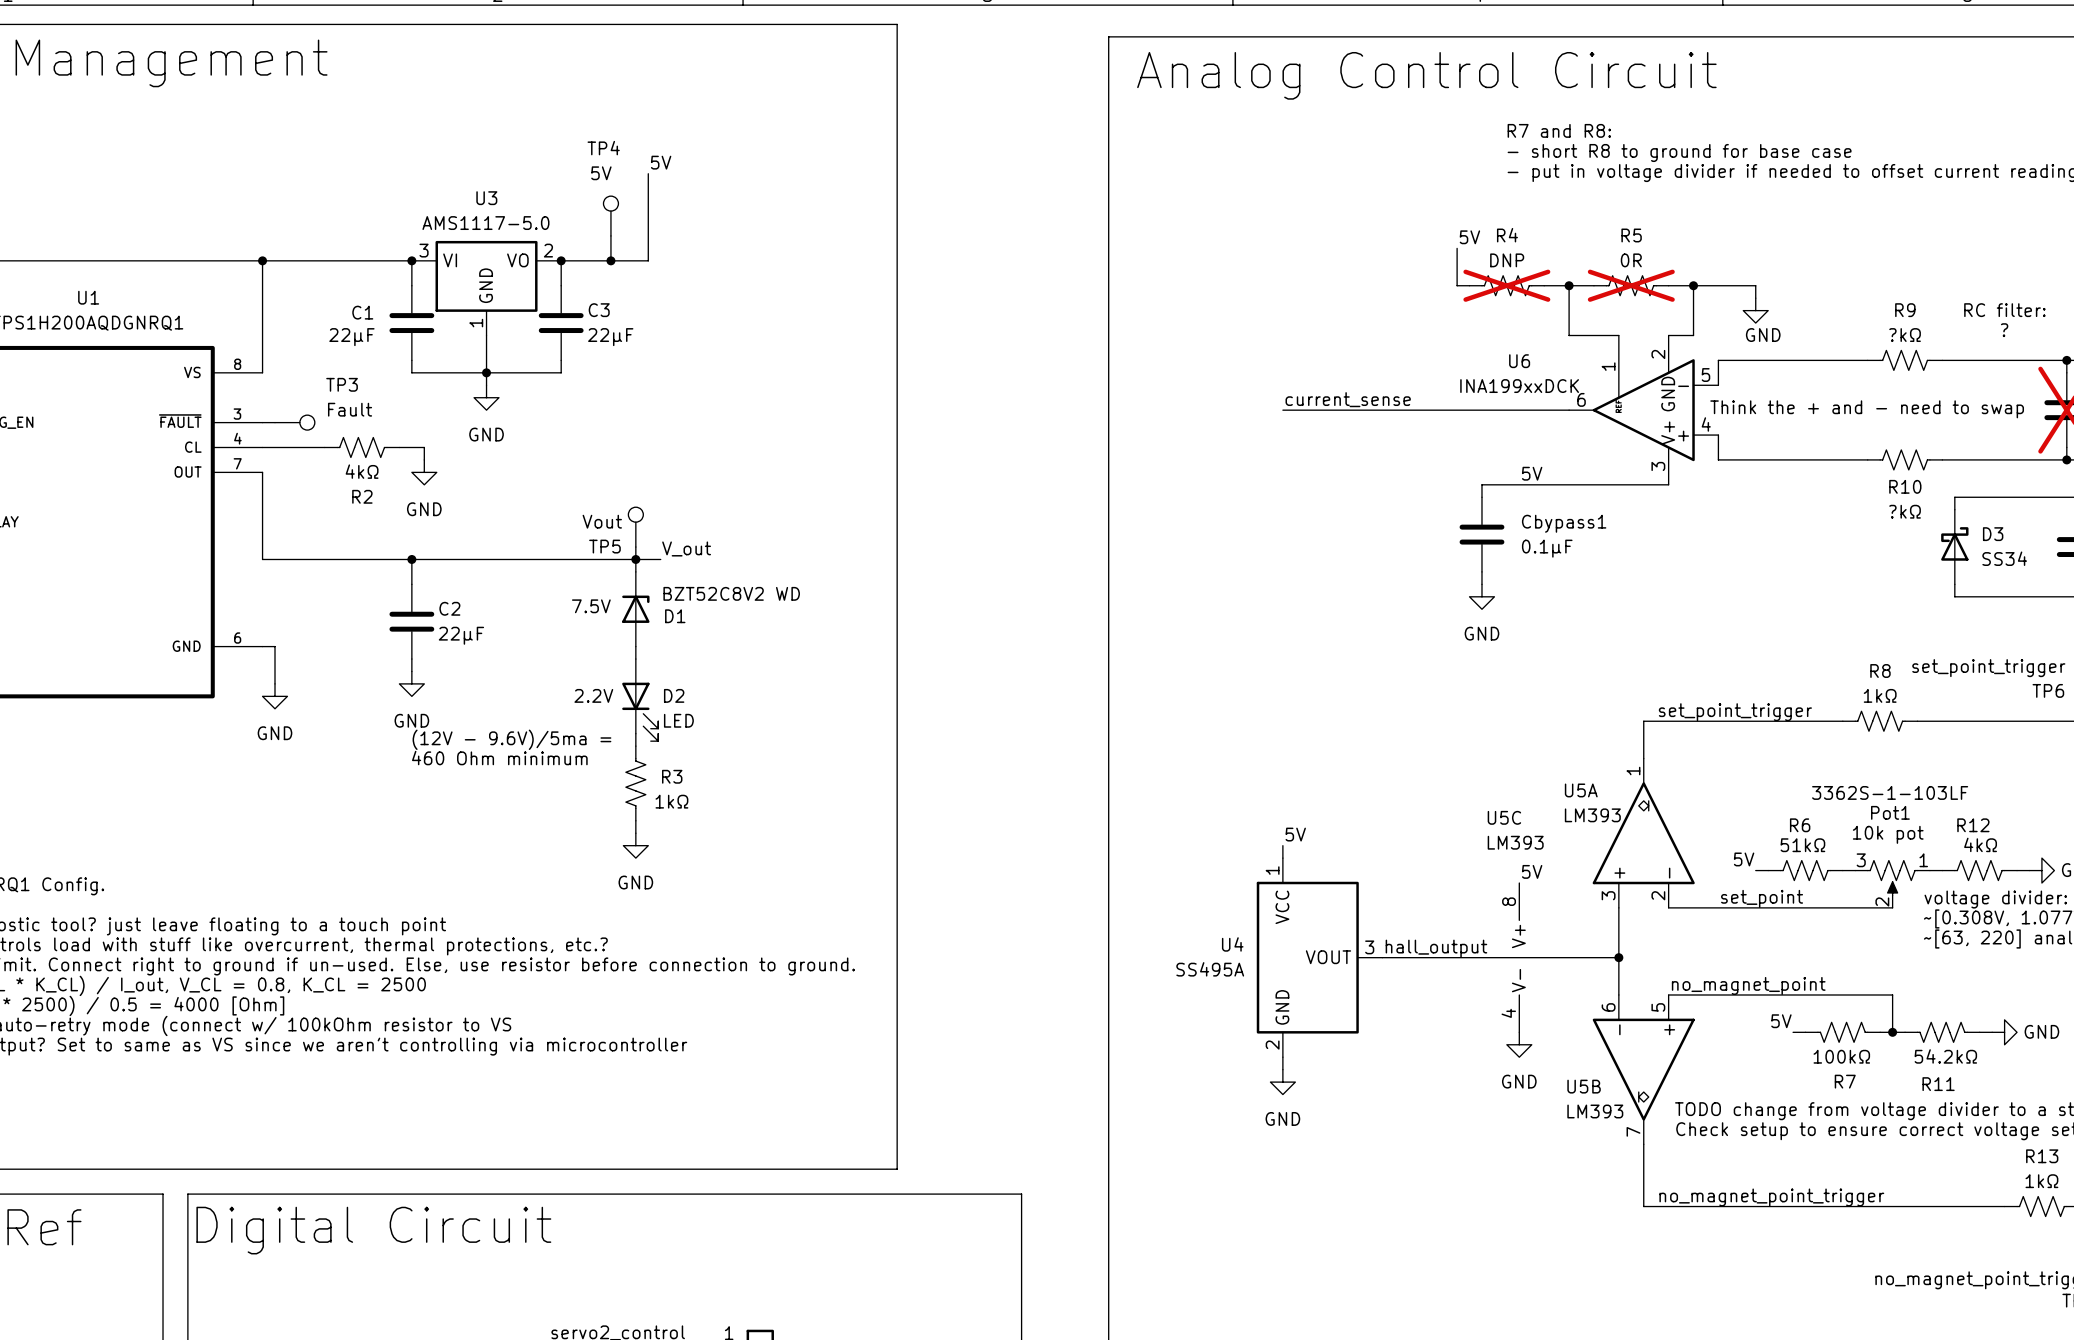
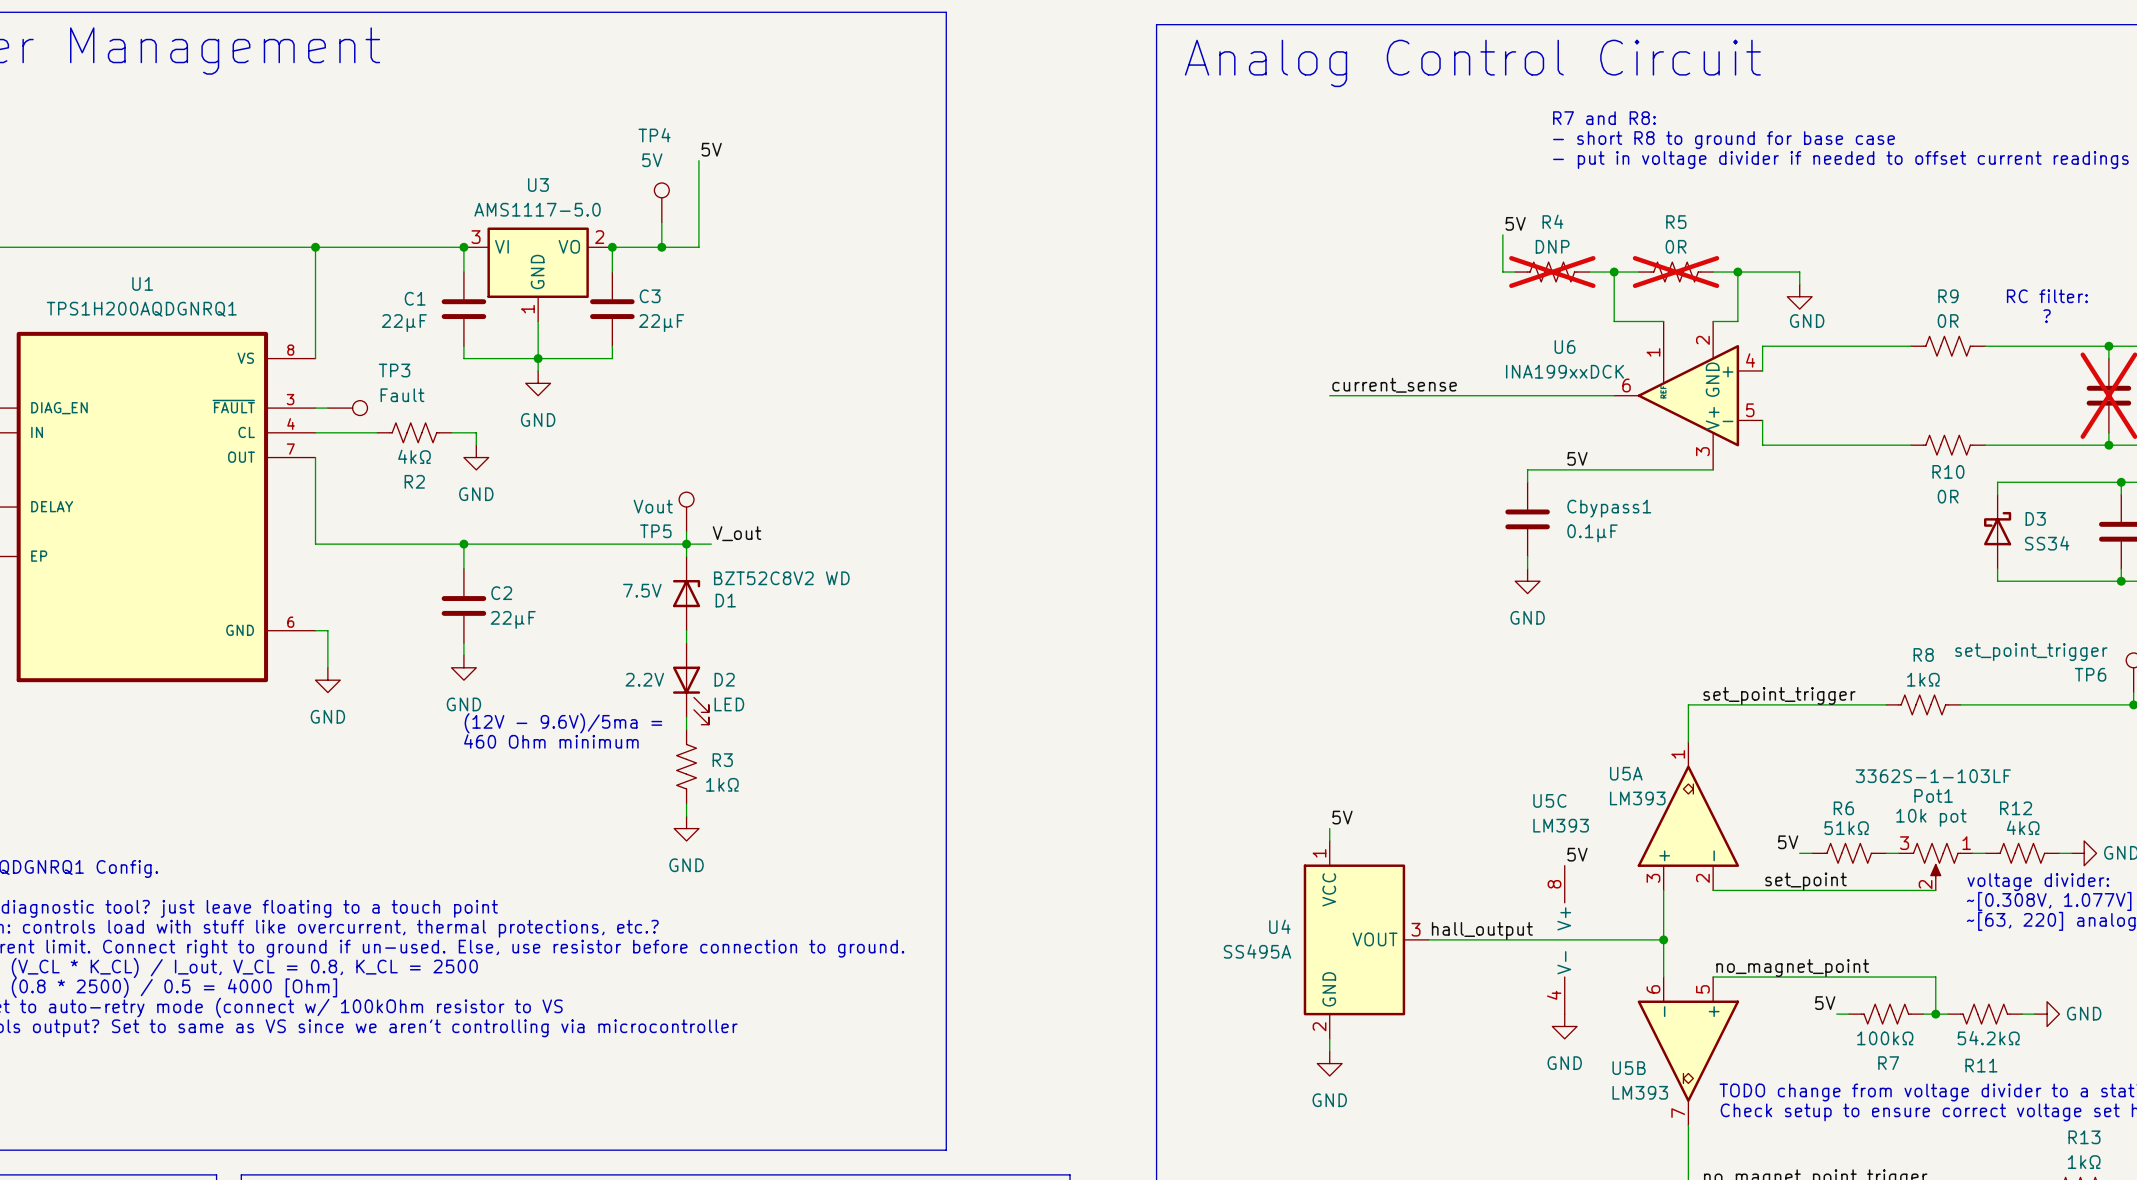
R9 value: ?kΩ (1905, 335) -> 0R (1948, 321)
U6 pin number: 5 (1705, 375) -> 4 (1750, 360)
U6 pin name: - (1683, 386) -> + (1728, 371)
text: Think the + and - need to swap (1867, 409) -> none
U6 pin number: 4 (1706, 424) -> 5 (1750, 410)
U6 pin name: + (1683, 436) -> - (1728, 421)
R10 value: ?kΩ (1905, 511) -> 0R (1948, 496)

